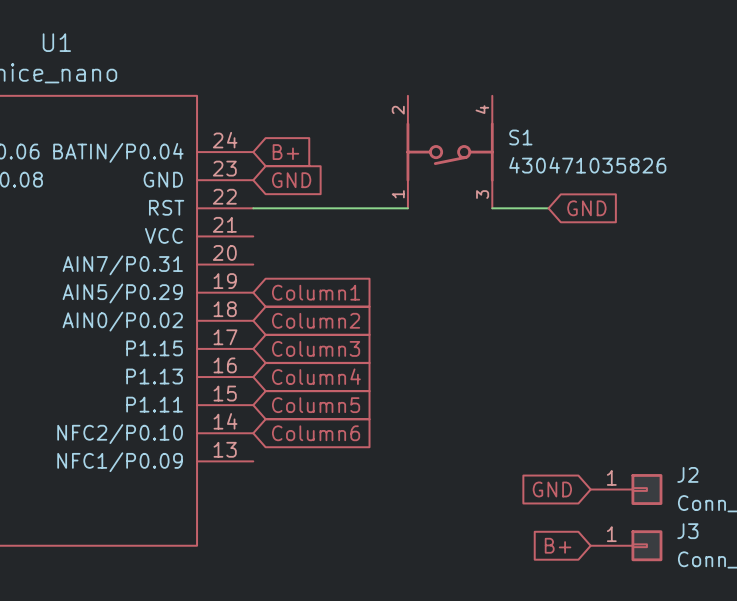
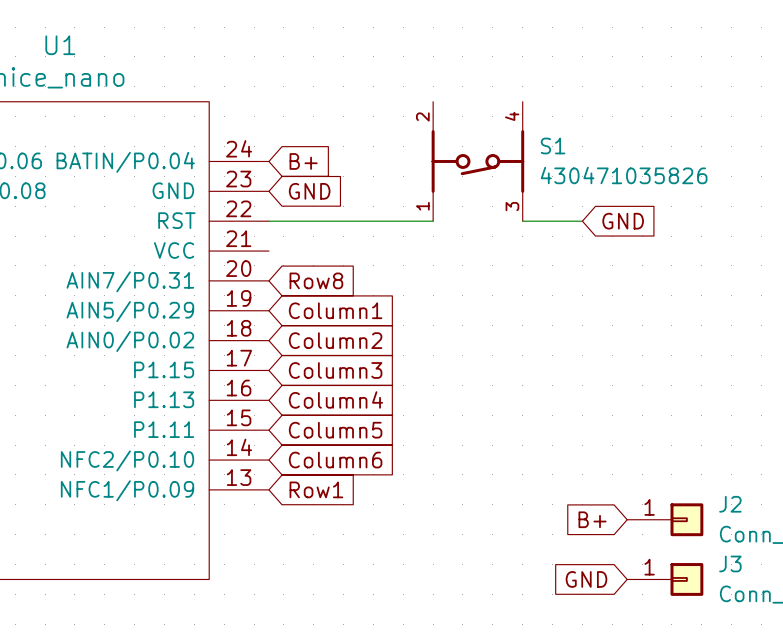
global label: none -> Row8 (316, 280)
global label: none -> Row1 (316, 489)
global label: GND (552, 489) -> B+ (592, 519)
global label: B+ (558, 545) -> GND (586, 579)

